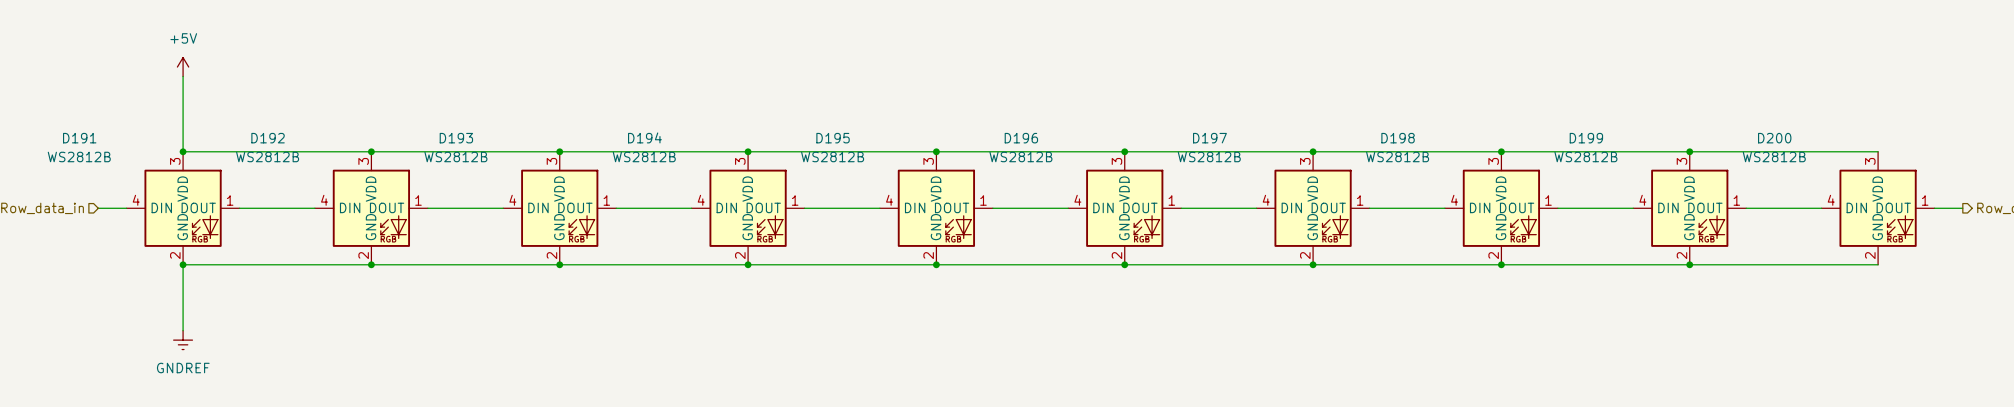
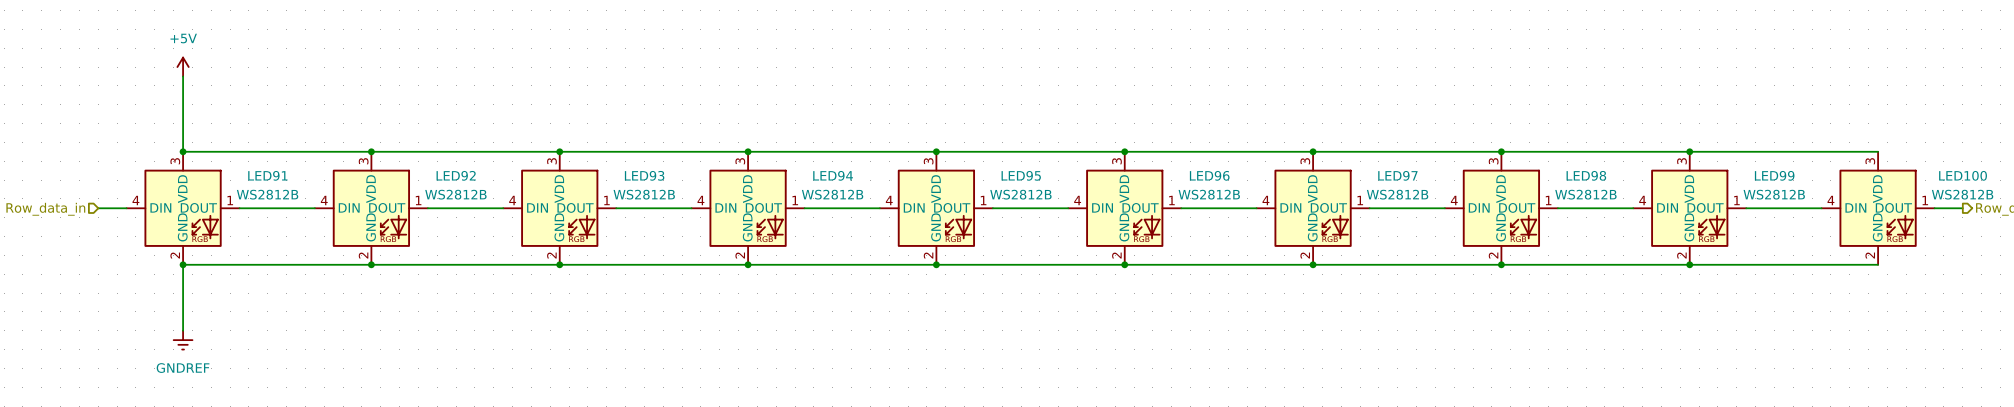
D194 name: D194 (644, 137) -> LED94 (833, 175)
D191 name: D191 (79, 138) -> LED91 (267, 175)
D192 name: D192 (268, 138) -> LED92 (456, 175)
D193 name: D193 (456, 138) -> LED93 (644, 175)
D195 name: D195 (833, 138) -> LED95 (1021, 175)
D196 name: D196 (1021, 138) -> LED96 (1209, 175)
D197 name: D197 (1209, 138) -> LED97 (1397, 175)
D198 name: D198 (1398, 138) -> LED98 (1586, 175)
D199 name: D199 (1586, 138) -> LED99 (1774, 175)
D200 name: D200 (1774, 138) -> LED100 (1963, 175)
D191 value position: WS2812B (79, 156) -> WS2812B (267, 194)
D192 value position: WS2812B (267, 156) -> WS2812B (455, 194)
D193 value position: WS2812B (455, 156) -> WS2812B (644, 194)
D194 value position: WS2812B (644, 156) -> WS2812B (832, 194)
D195 value position: WS2812B (832, 156) -> WS2812B (1020, 194)
D196 value position: WS2812B (1020, 156) -> WS2812B (1209, 194)
D197 value position: WS2812B (1209, 156) -> WS2812B (1397, 194)
D198 value position: WS2812B (1397, 156) -> WS2812B (1585, 194)
D199 value position: WS2812B (1585, 156) -> WS2812B (1774, 194)
D200 value position: WS2812B (1774, 156) -> WS2812B (1962, 194)

